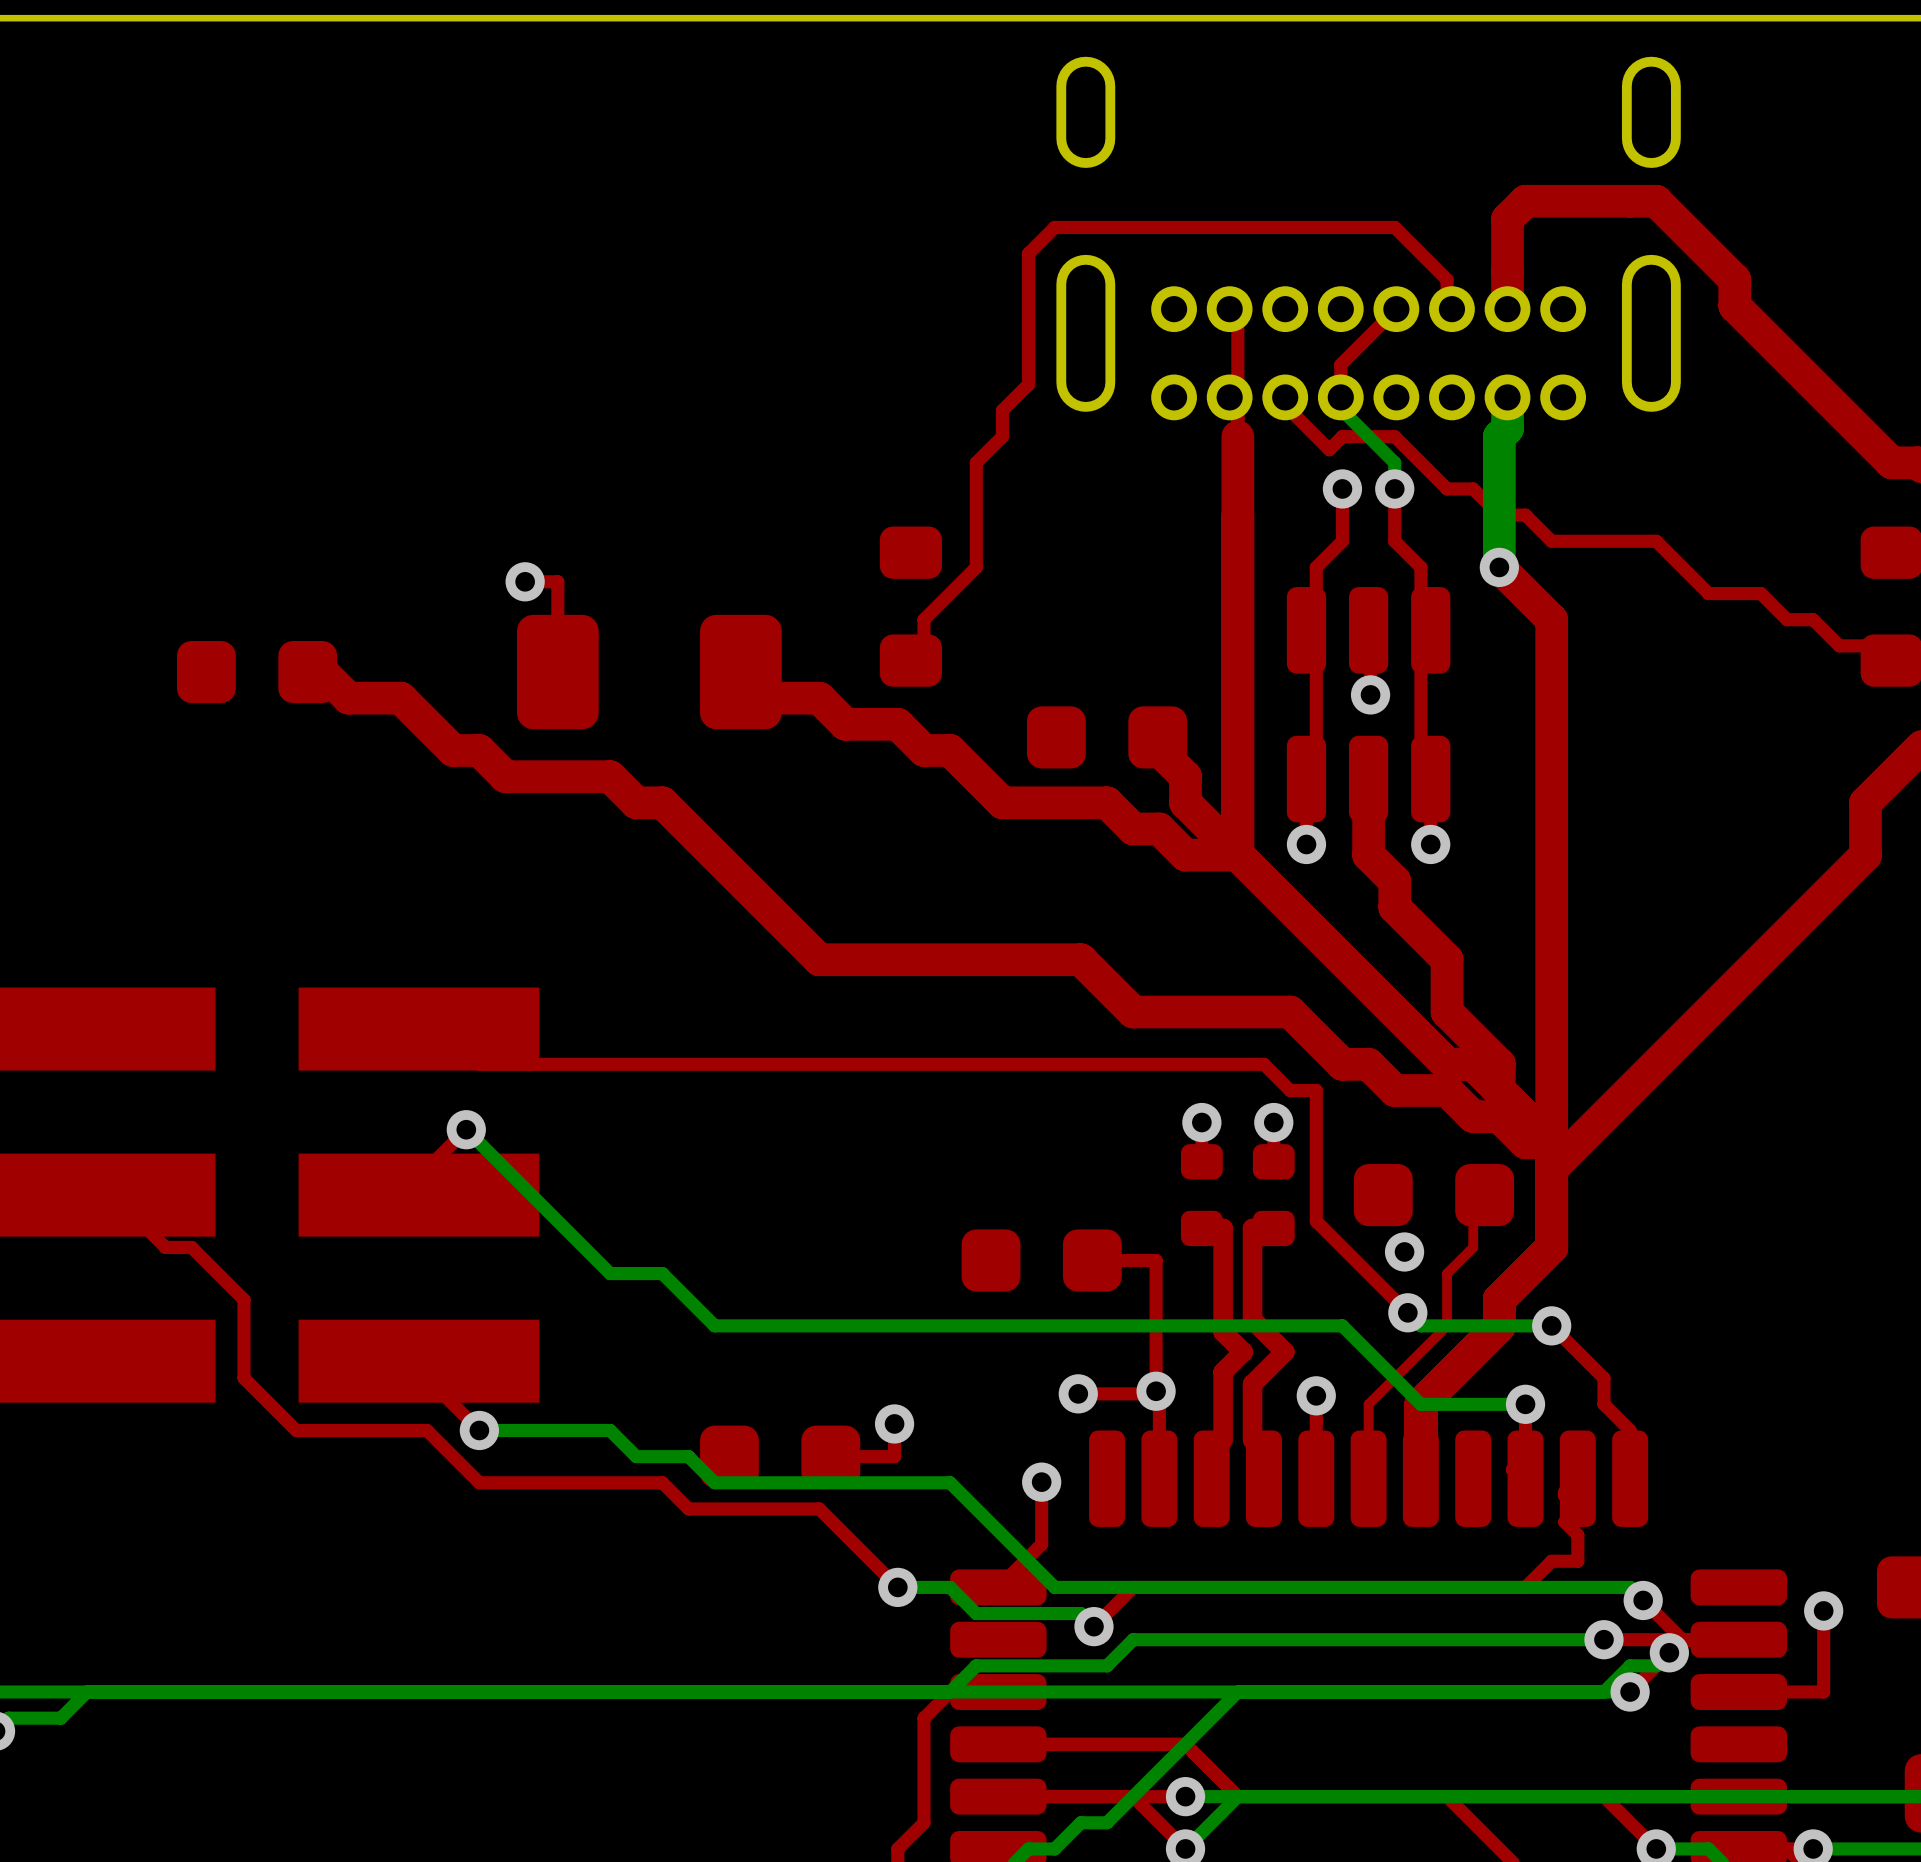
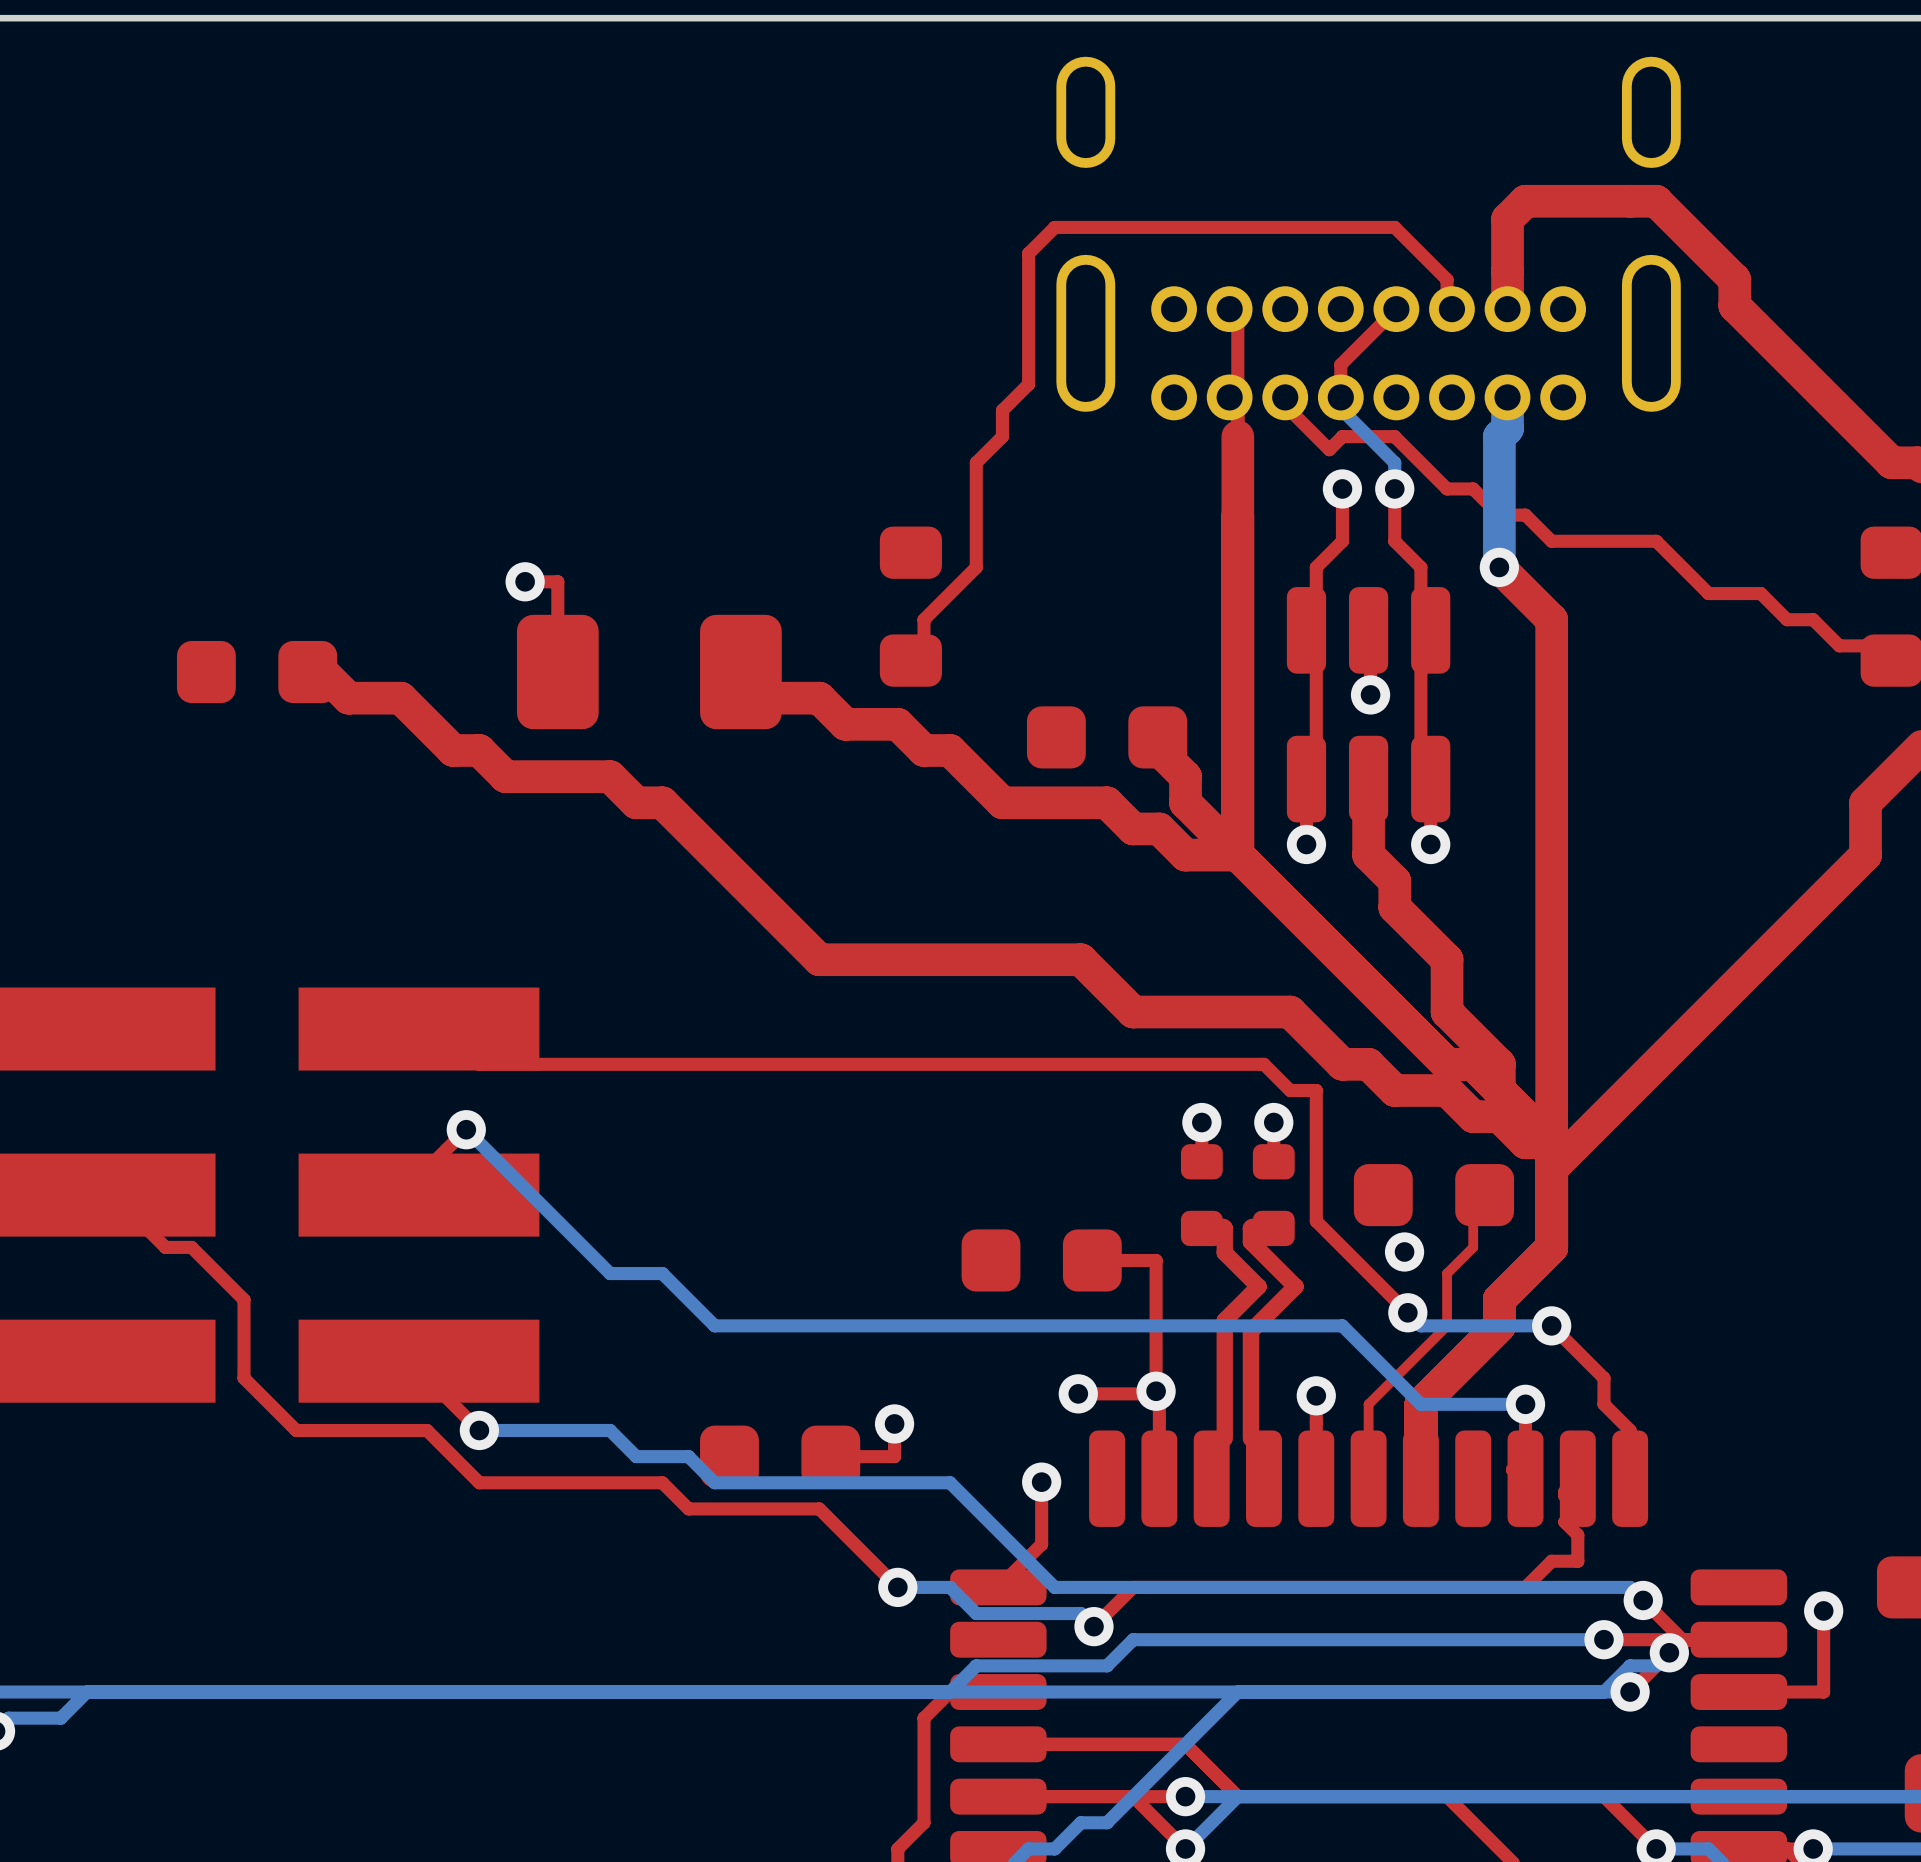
top track: (1223, 1228) (1223, 1331) (1243, 1352) (1223, 1372) (1223, 1440) -> (1223, 1228) (1224, 1228) (1224, 1252) (1258, 1286) (1224, 1320) (1224, 1438)
top track: (1252, 1228) (1252, 1319) (1284, 1352) (1252, 1384) (1252, 1440) -> (1252, 1228) (1250, 1228) (1250, 1241) (1295, 1286) (1250, 1331) (1250, 1438)

